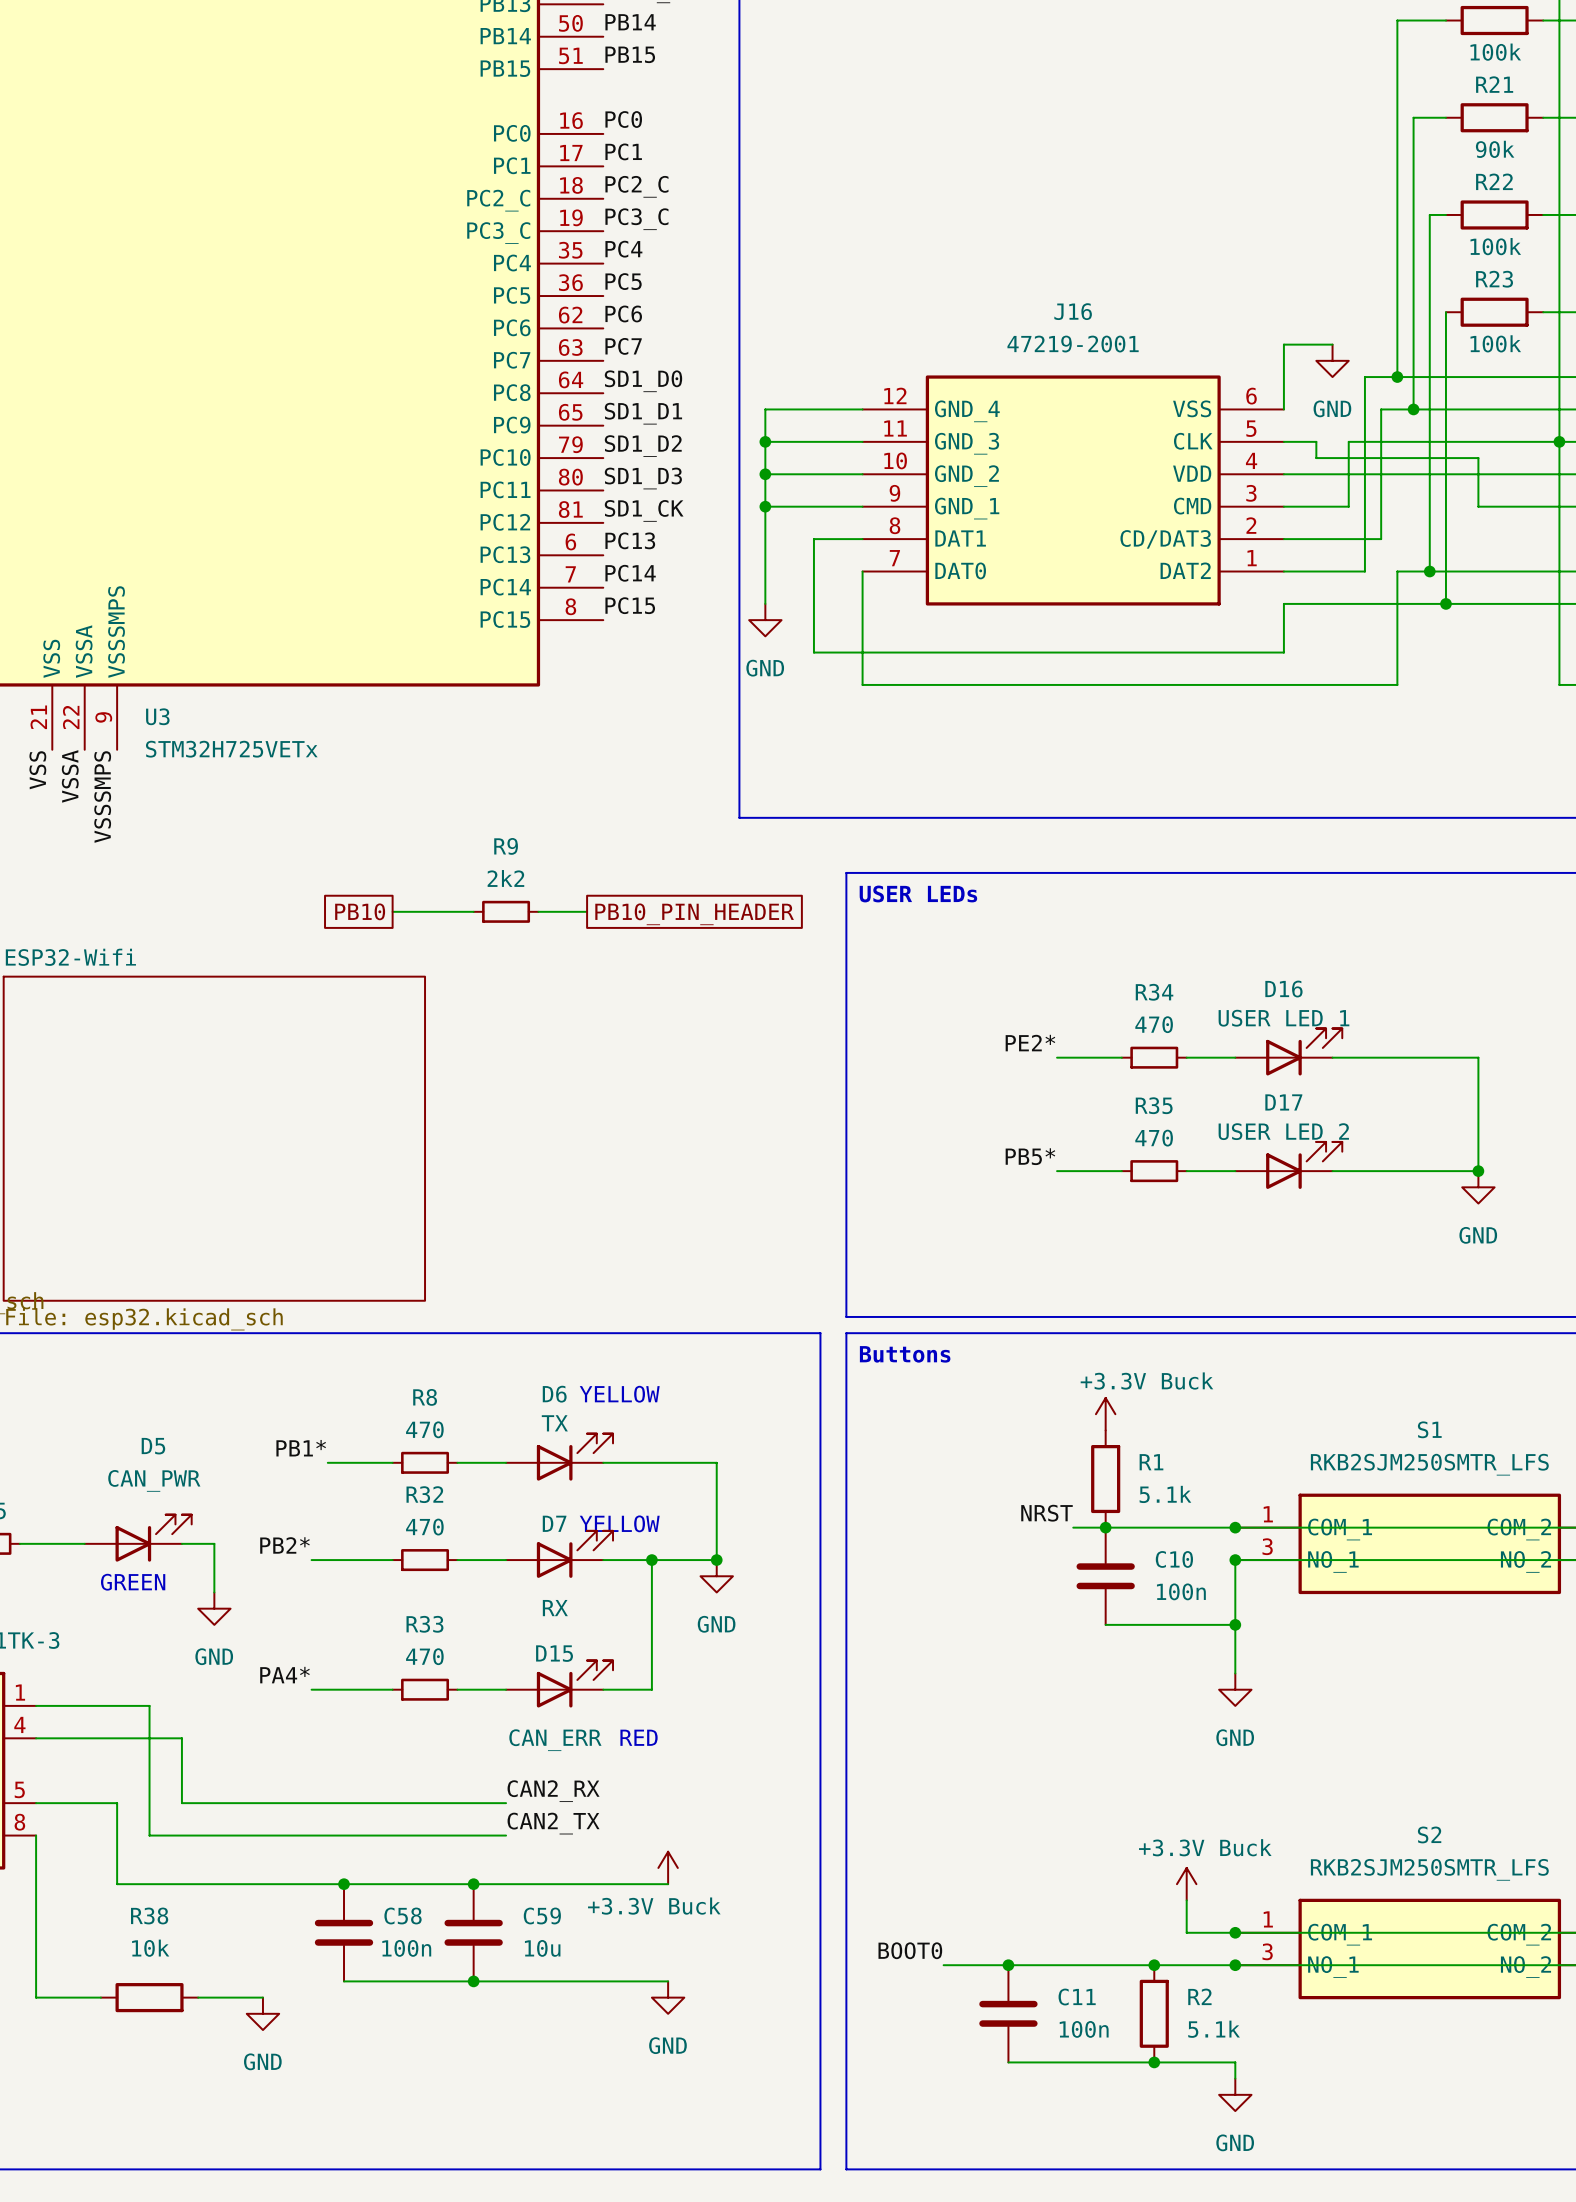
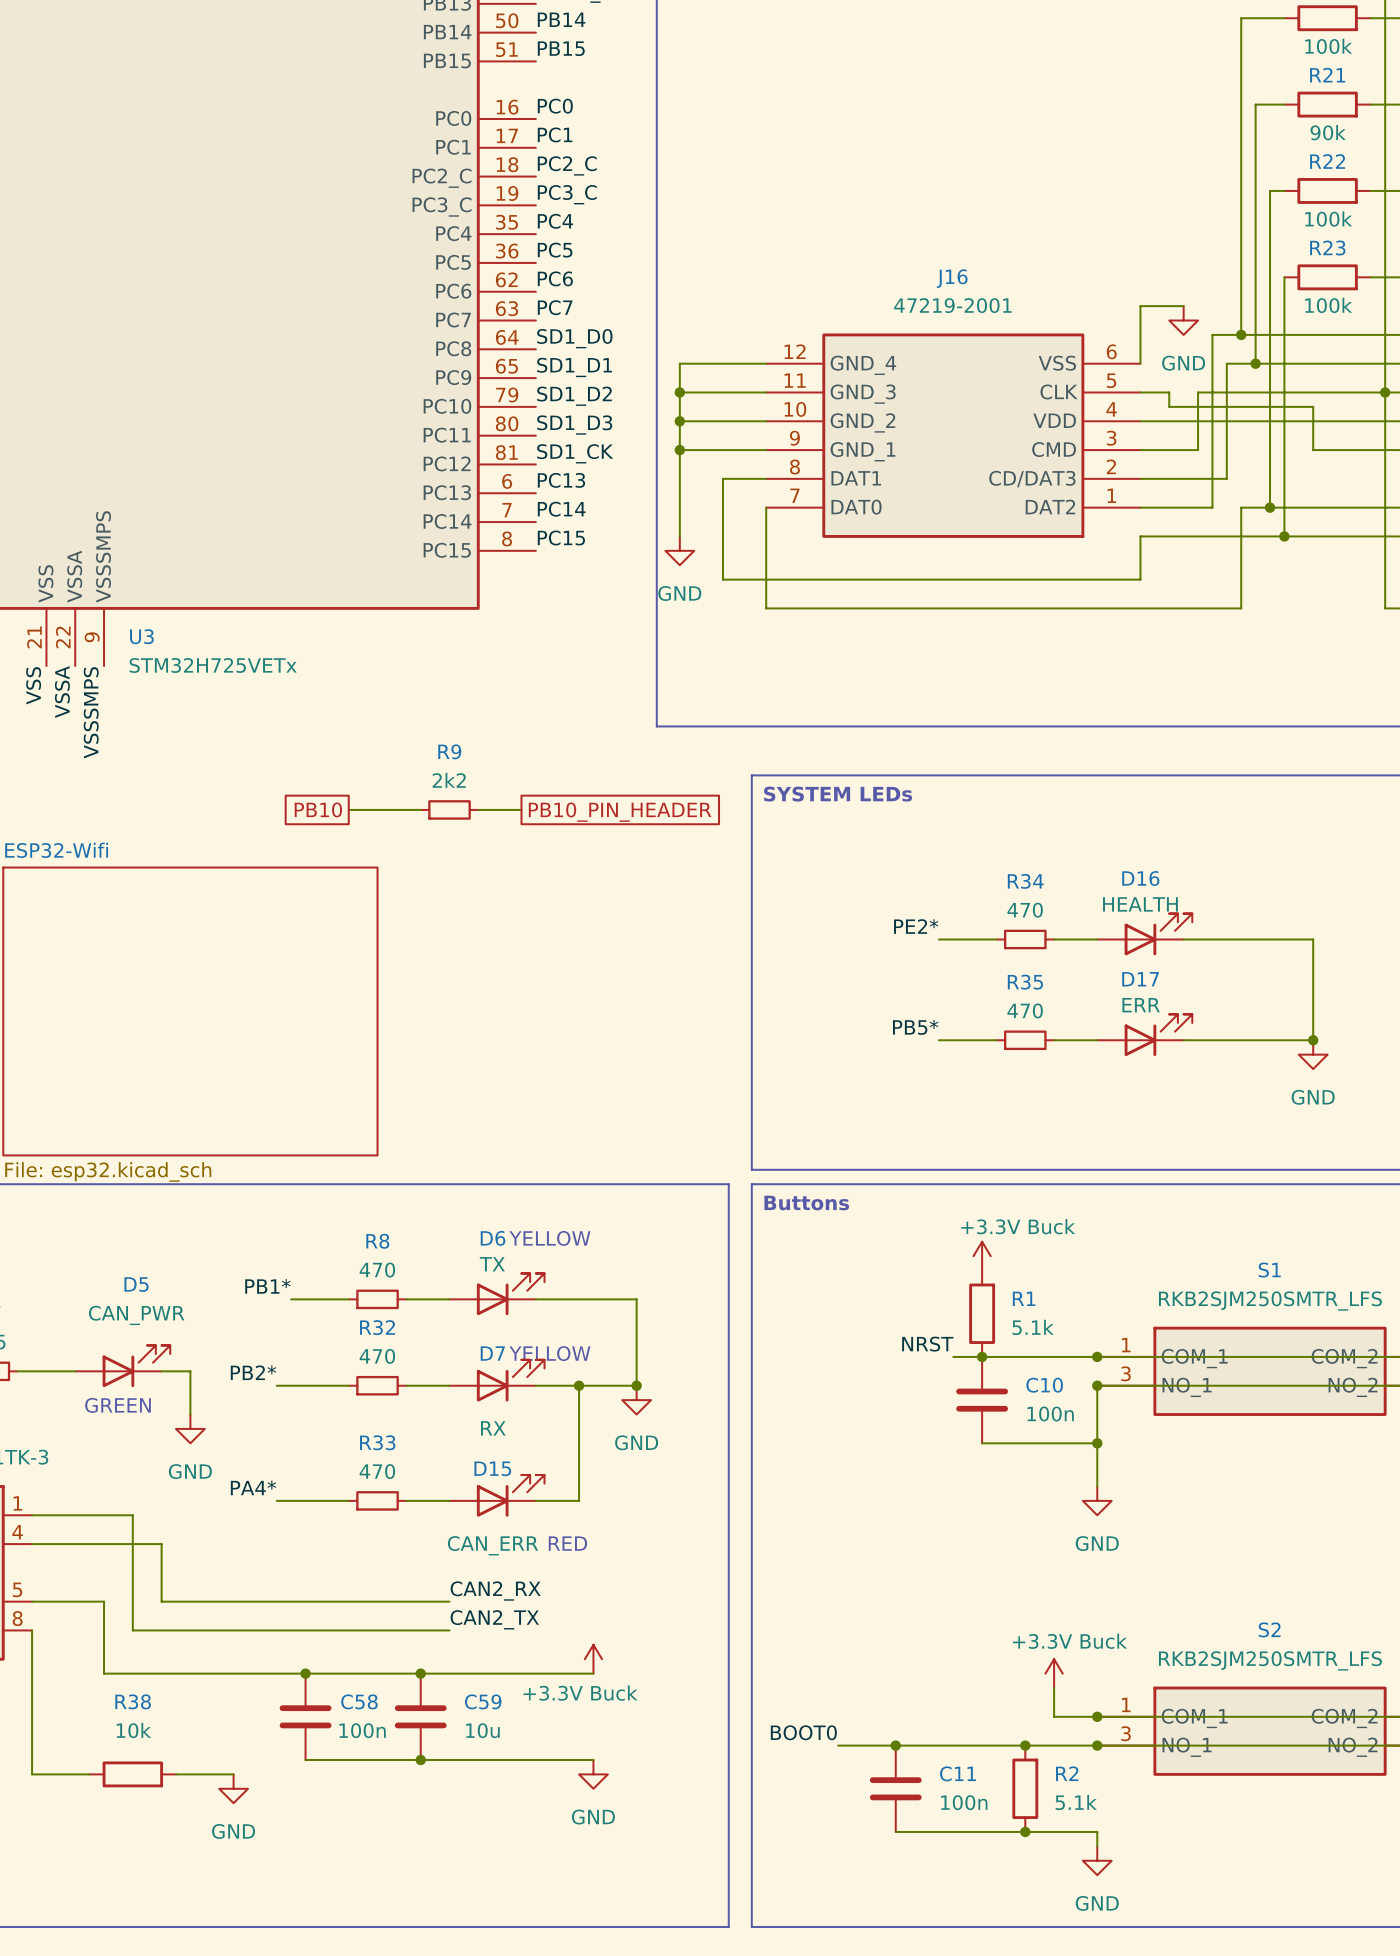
text: USER LEDs (918, 893) -> SYSTEM LEDs (838, 794)
D16 value: USER LED 1 (1283, 1018) -> HEALTH (1140, 904)
D17 value: USER LED 2 (1283, 1131) -> ERR (1141, 1005)

